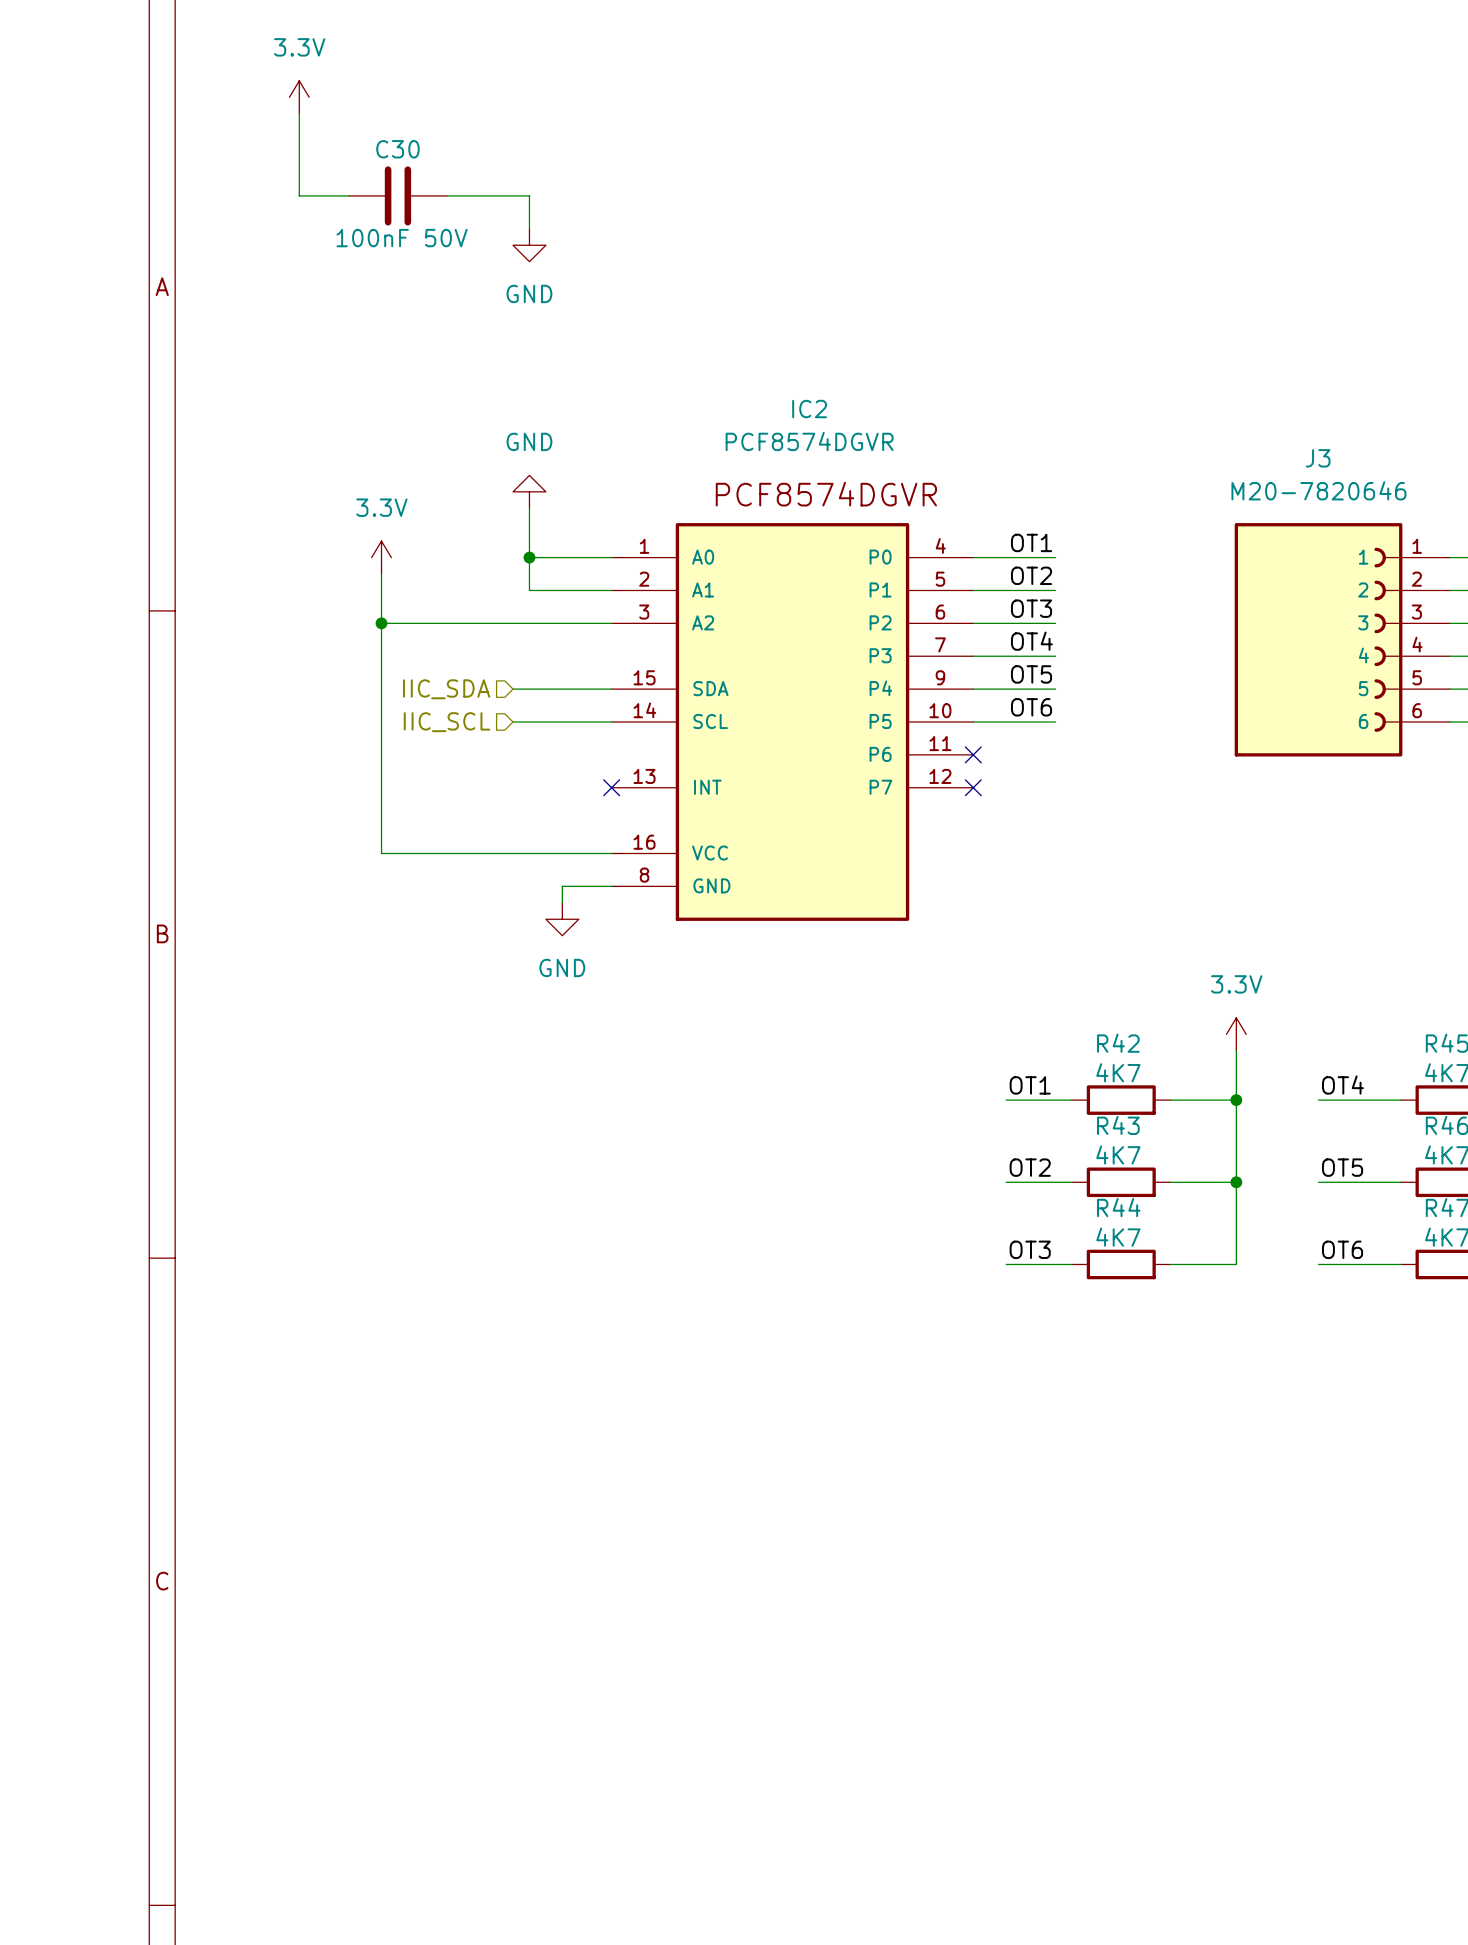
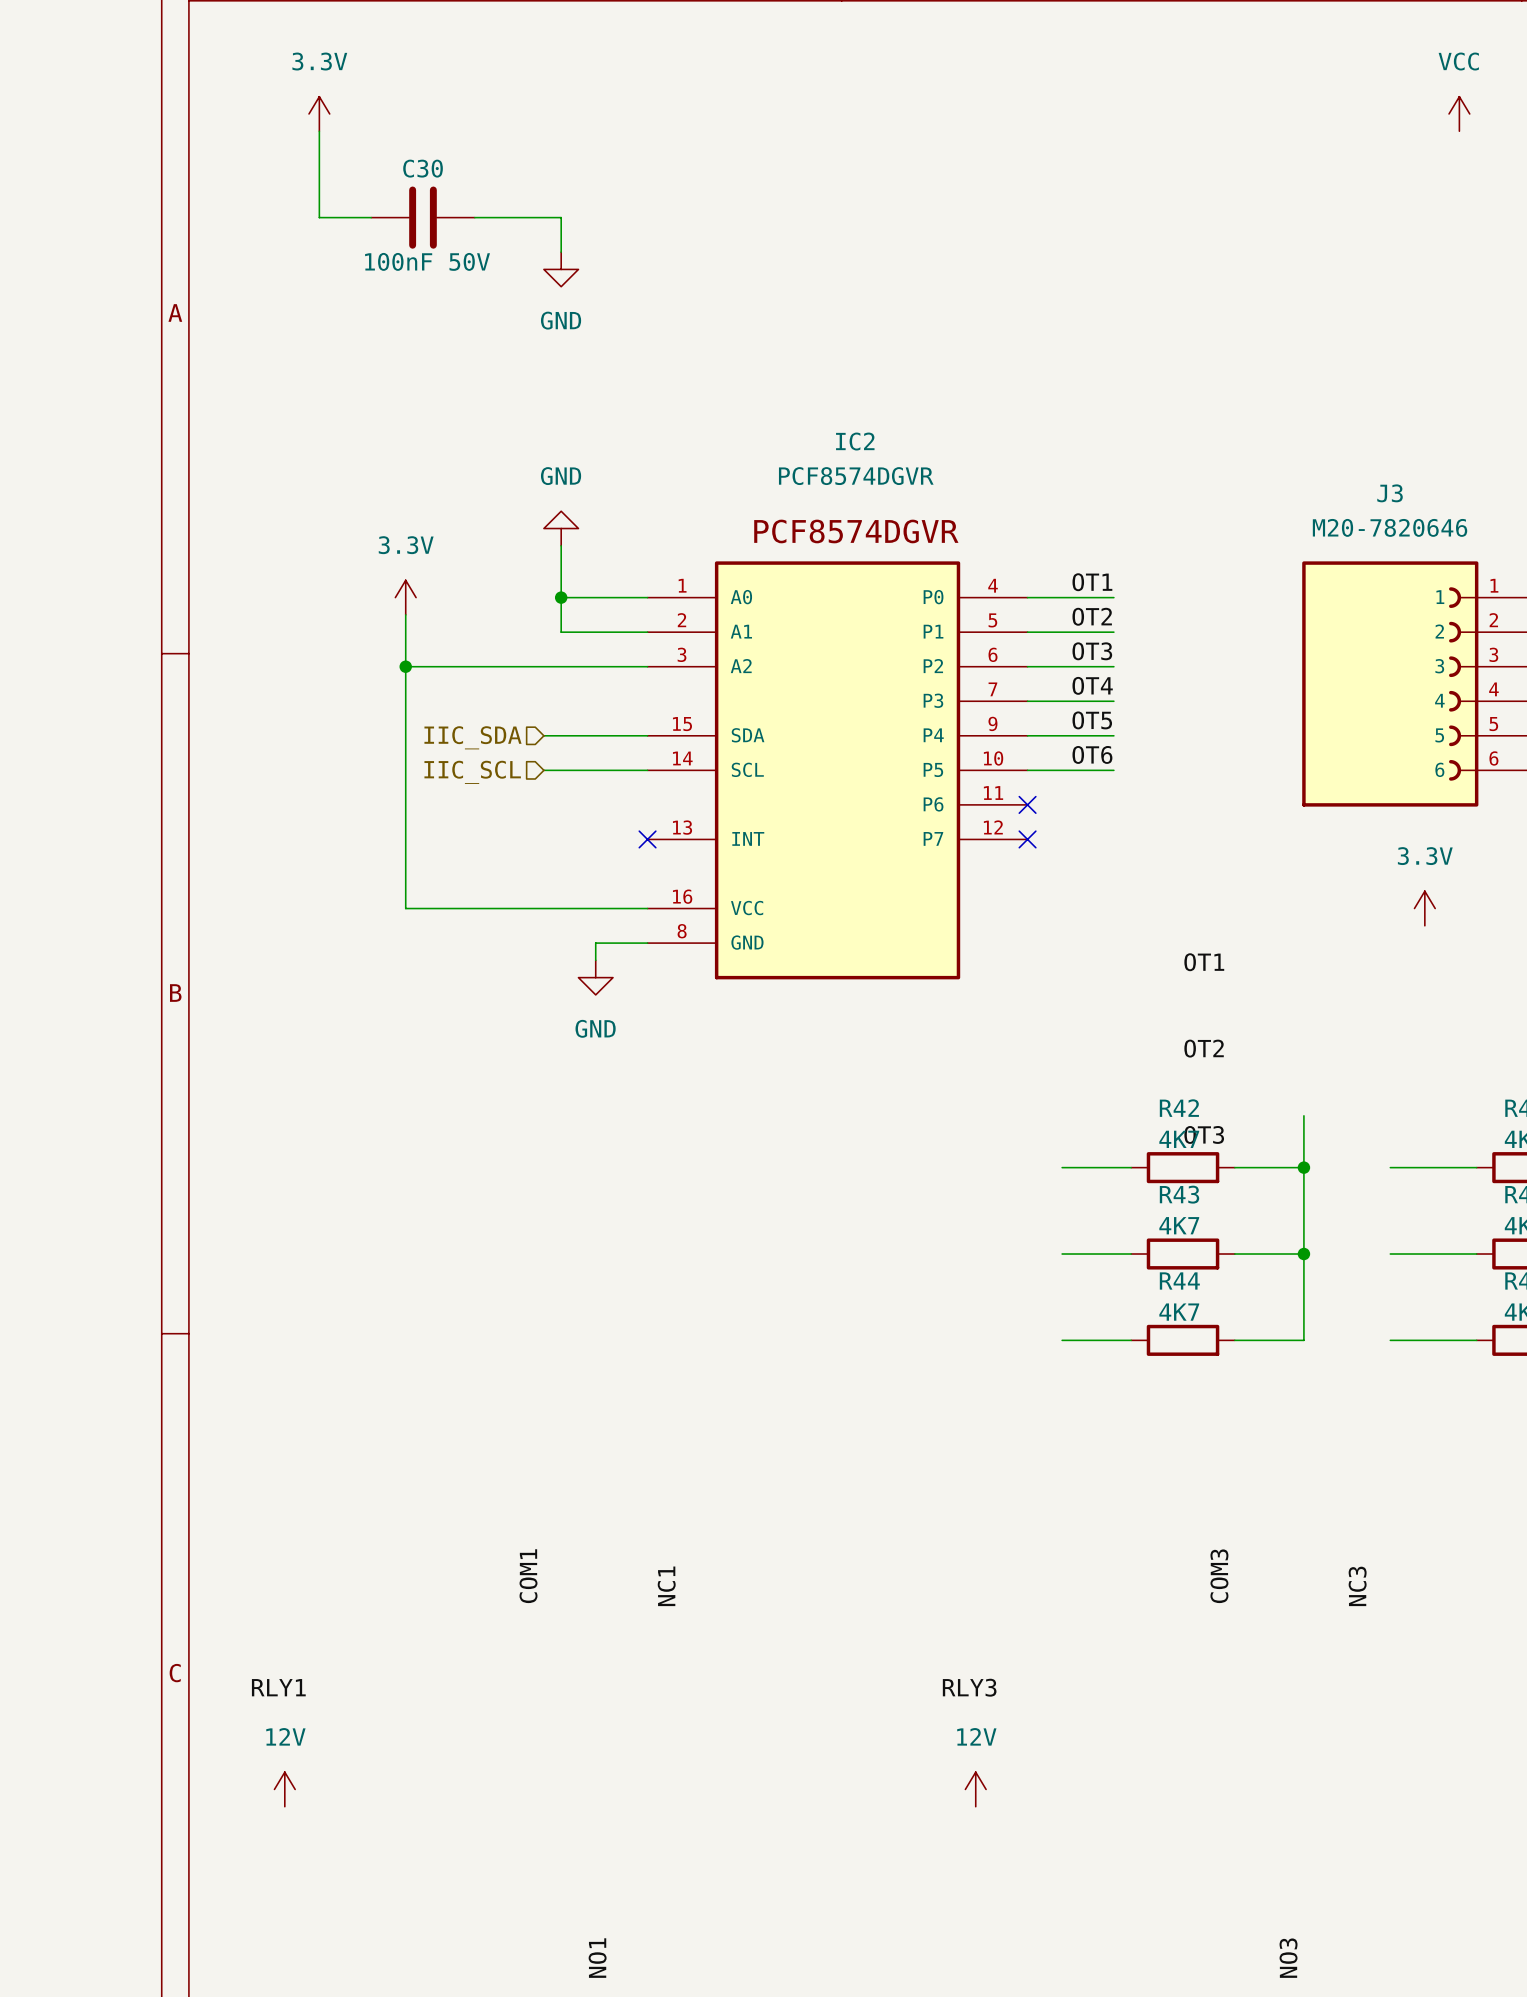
power symbol: none -> VCC (1459, 113)
power symbol: none -> 3.3V (1424, 908)
power symbol: 3.3V (1236, 1034) -> none
label position: OT1 (1030, 1085) -> OT1 (1204, 962)
label: OT4 (1342, 1085) -> none
label position: OT2 (1030, 1167) -> OT2 (1204, 1048)
label: OT5 (1342, 1167) -> none
label position: OT3 (1030, 1249) -> OT3 (1204, 1134)
label: OT6 (1342, 1249) -> none
label: none -> COM1 (528, 1576)
label: none -> COM3 (1219, 1576)
label: none -> NC1 (666, 1586)
label: none -> NC3 (1357, 1586)
label: none -> RLY1 (278, 1687)
label: none -> RLY3 (969, 1687)
power symbol: none -> 12V (284, 1789)
power symbol: none -> 12V (975, 1789)
label: none -> NO1 (597, 1958)
label: none -> NO3 (1288, 1958)

